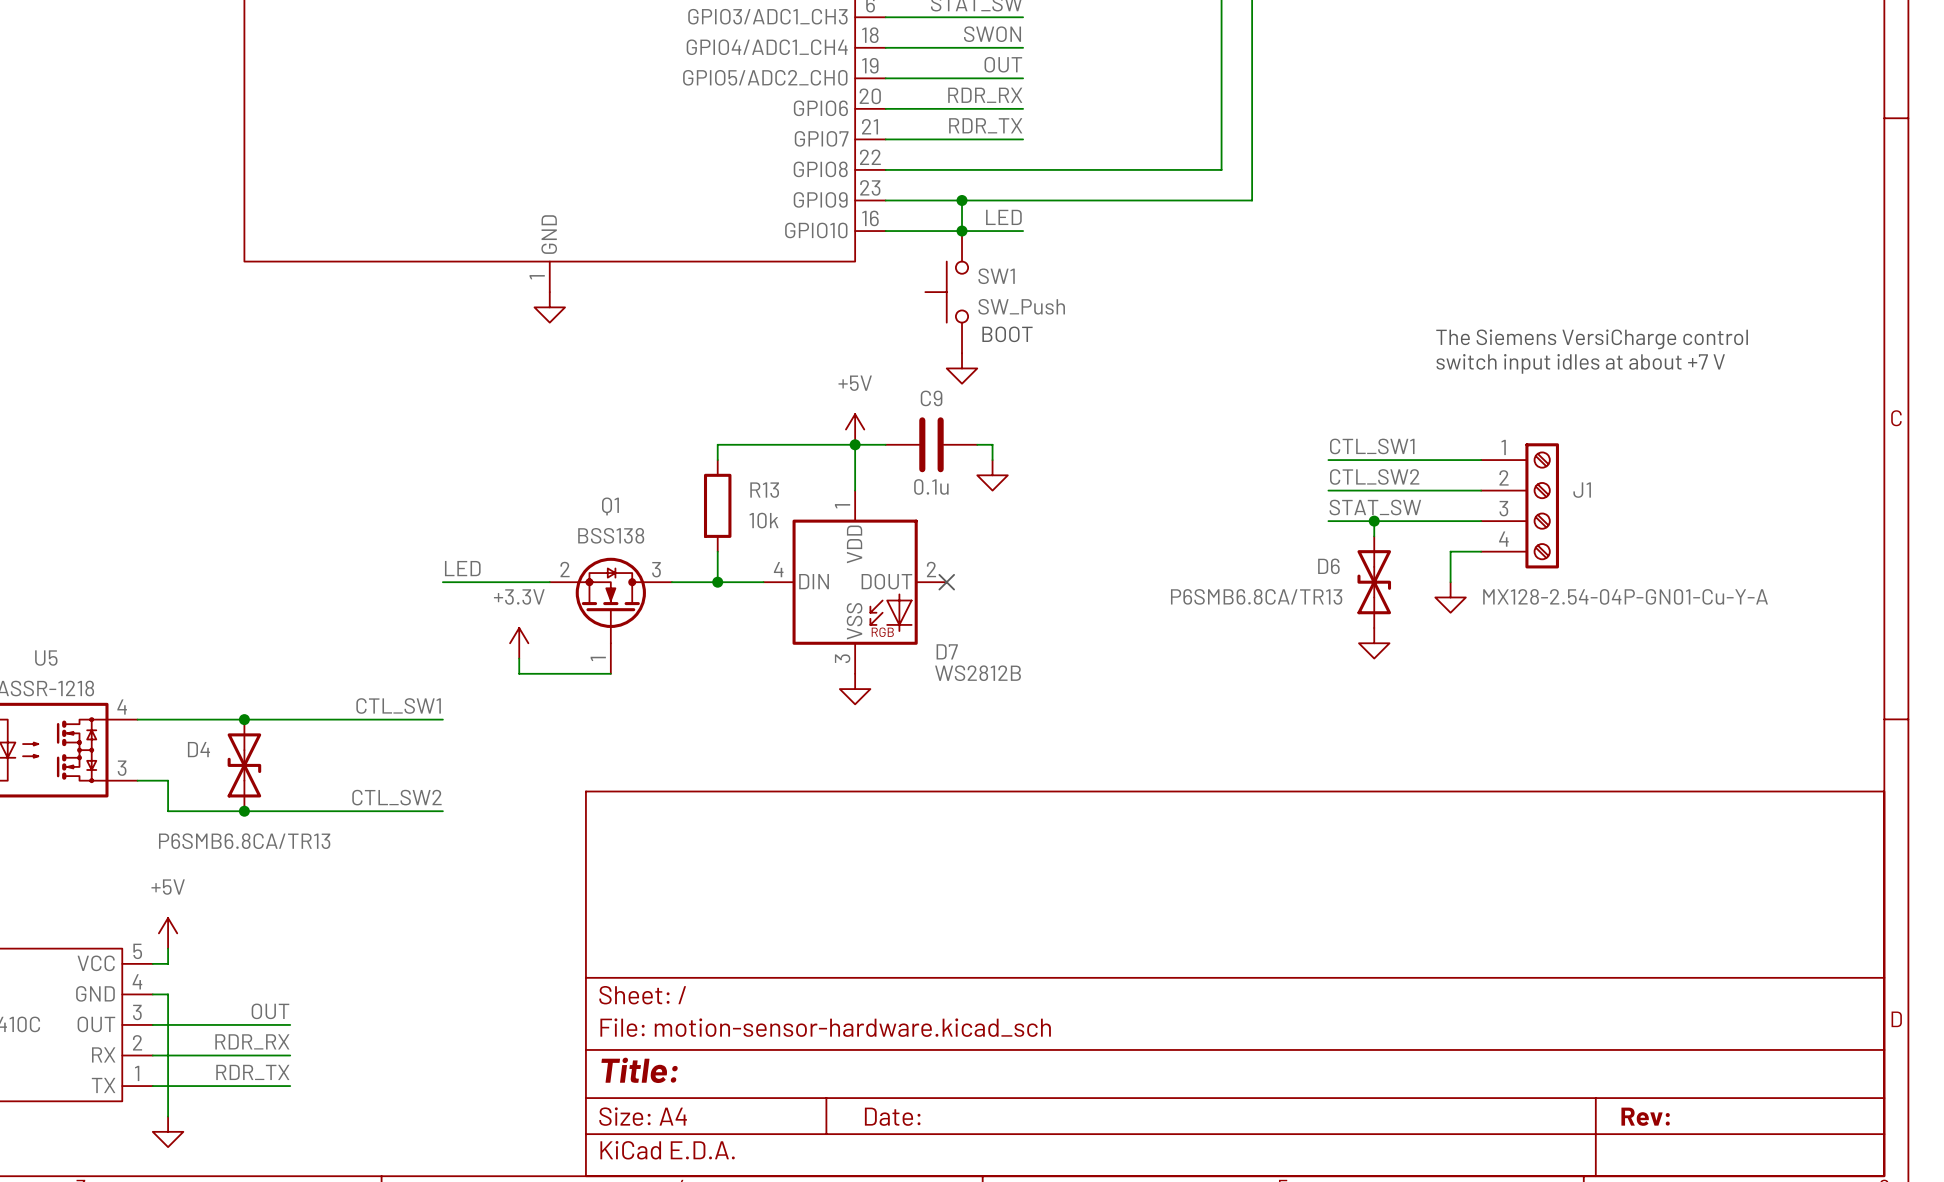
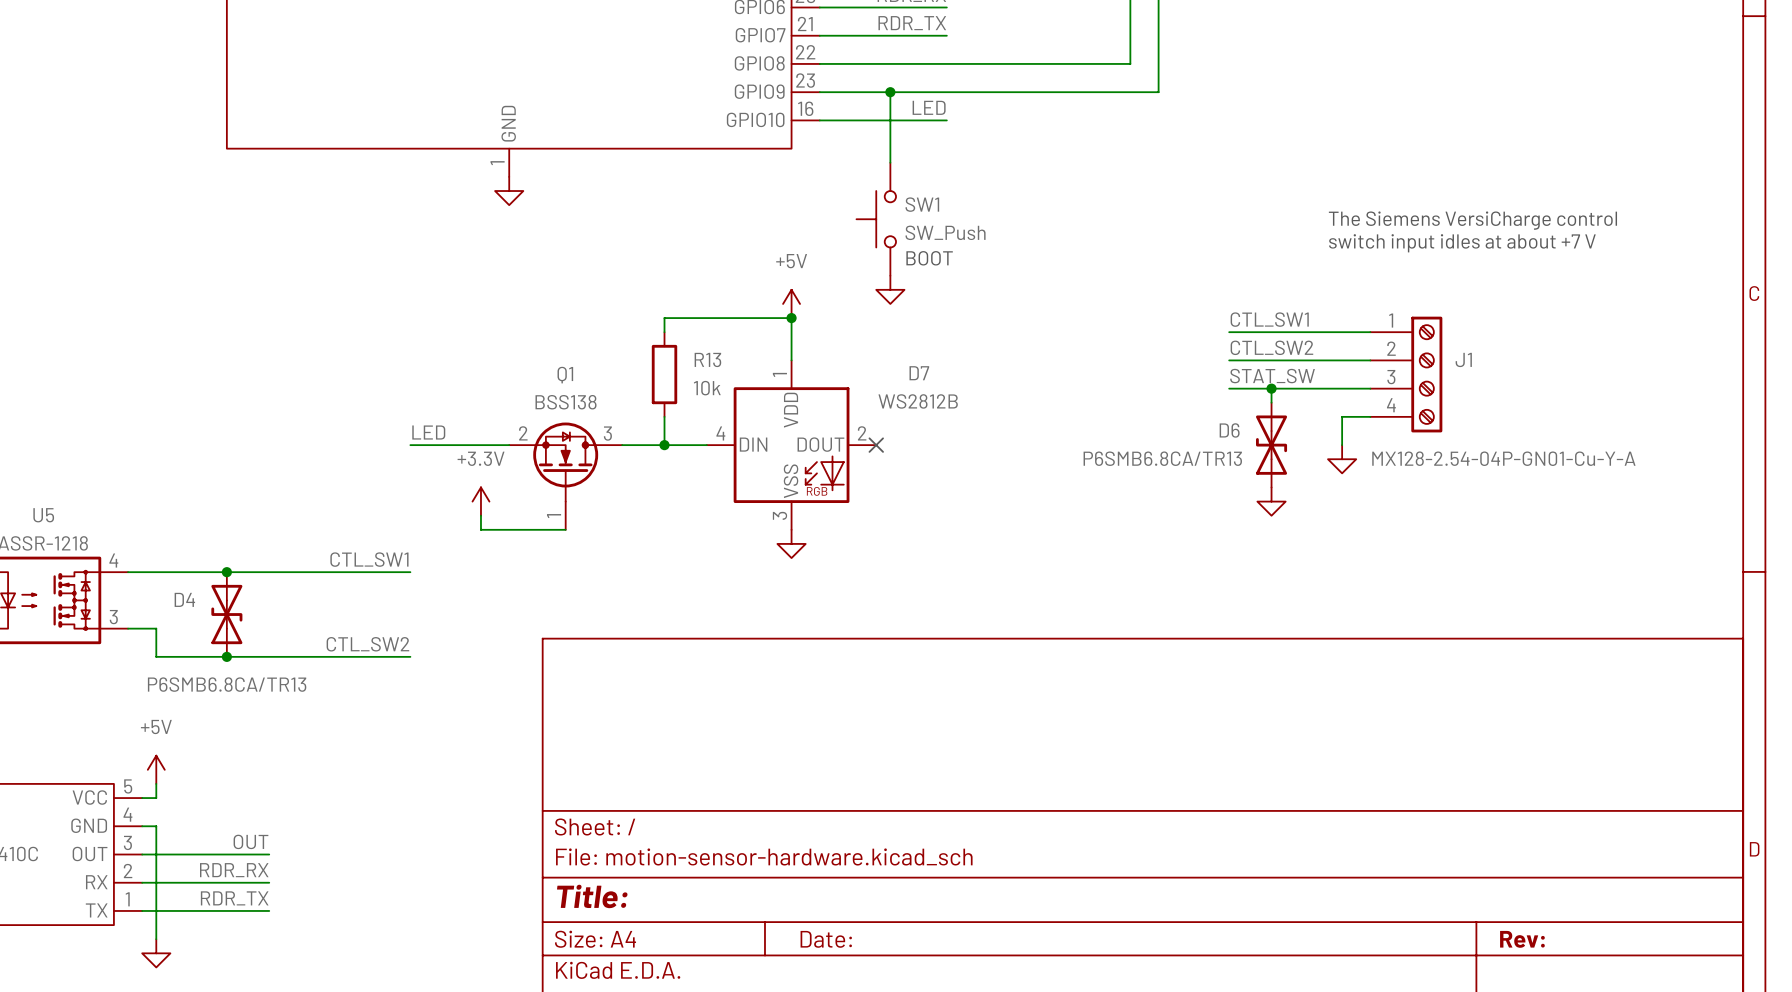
junction: (962, 231) -> none
SW1 position: (946, 292) -> (876, 219)
text position: BOOT (1007, 334) -> BOOT (929, 258)
power symbol: (962, 368) -> none
power symbol: none -> (890, 289)
wire: (855, 444) (885, 444) -> none
C9: 0.1u (931, 444) -> none
wire: (977, 444) (992, 444) (992, 460) -> none
power symbol: (992, 475) -> none
D7 name position: D7 (947, 651) -> D7 (919, 373)
D7 value position: WS2812B (978, 673) -> WS2812B (918, 401)

